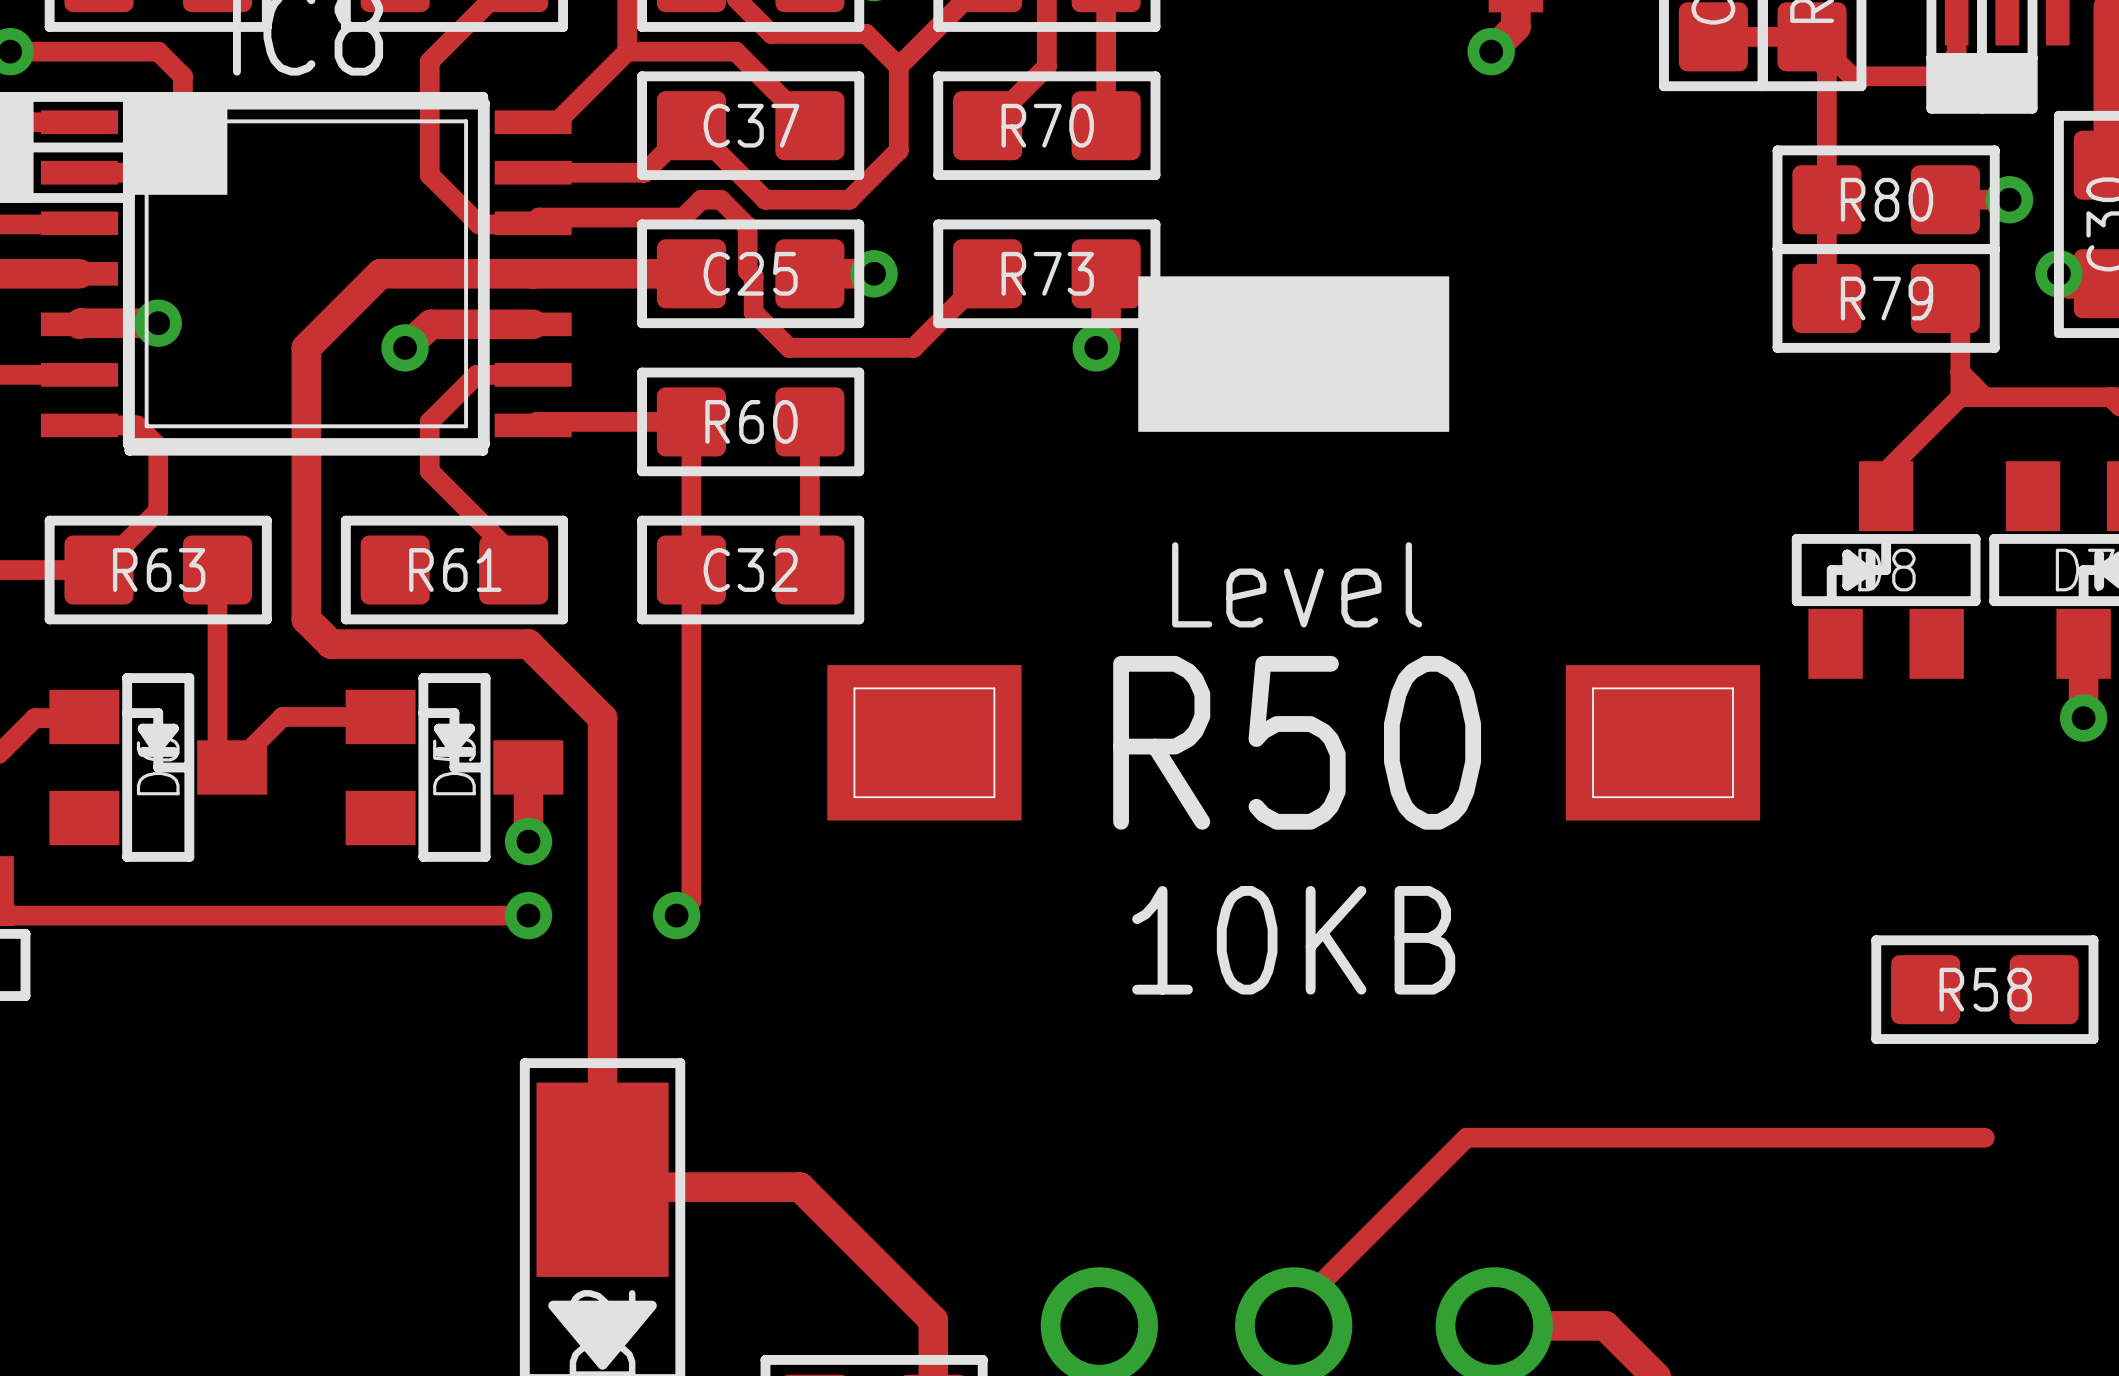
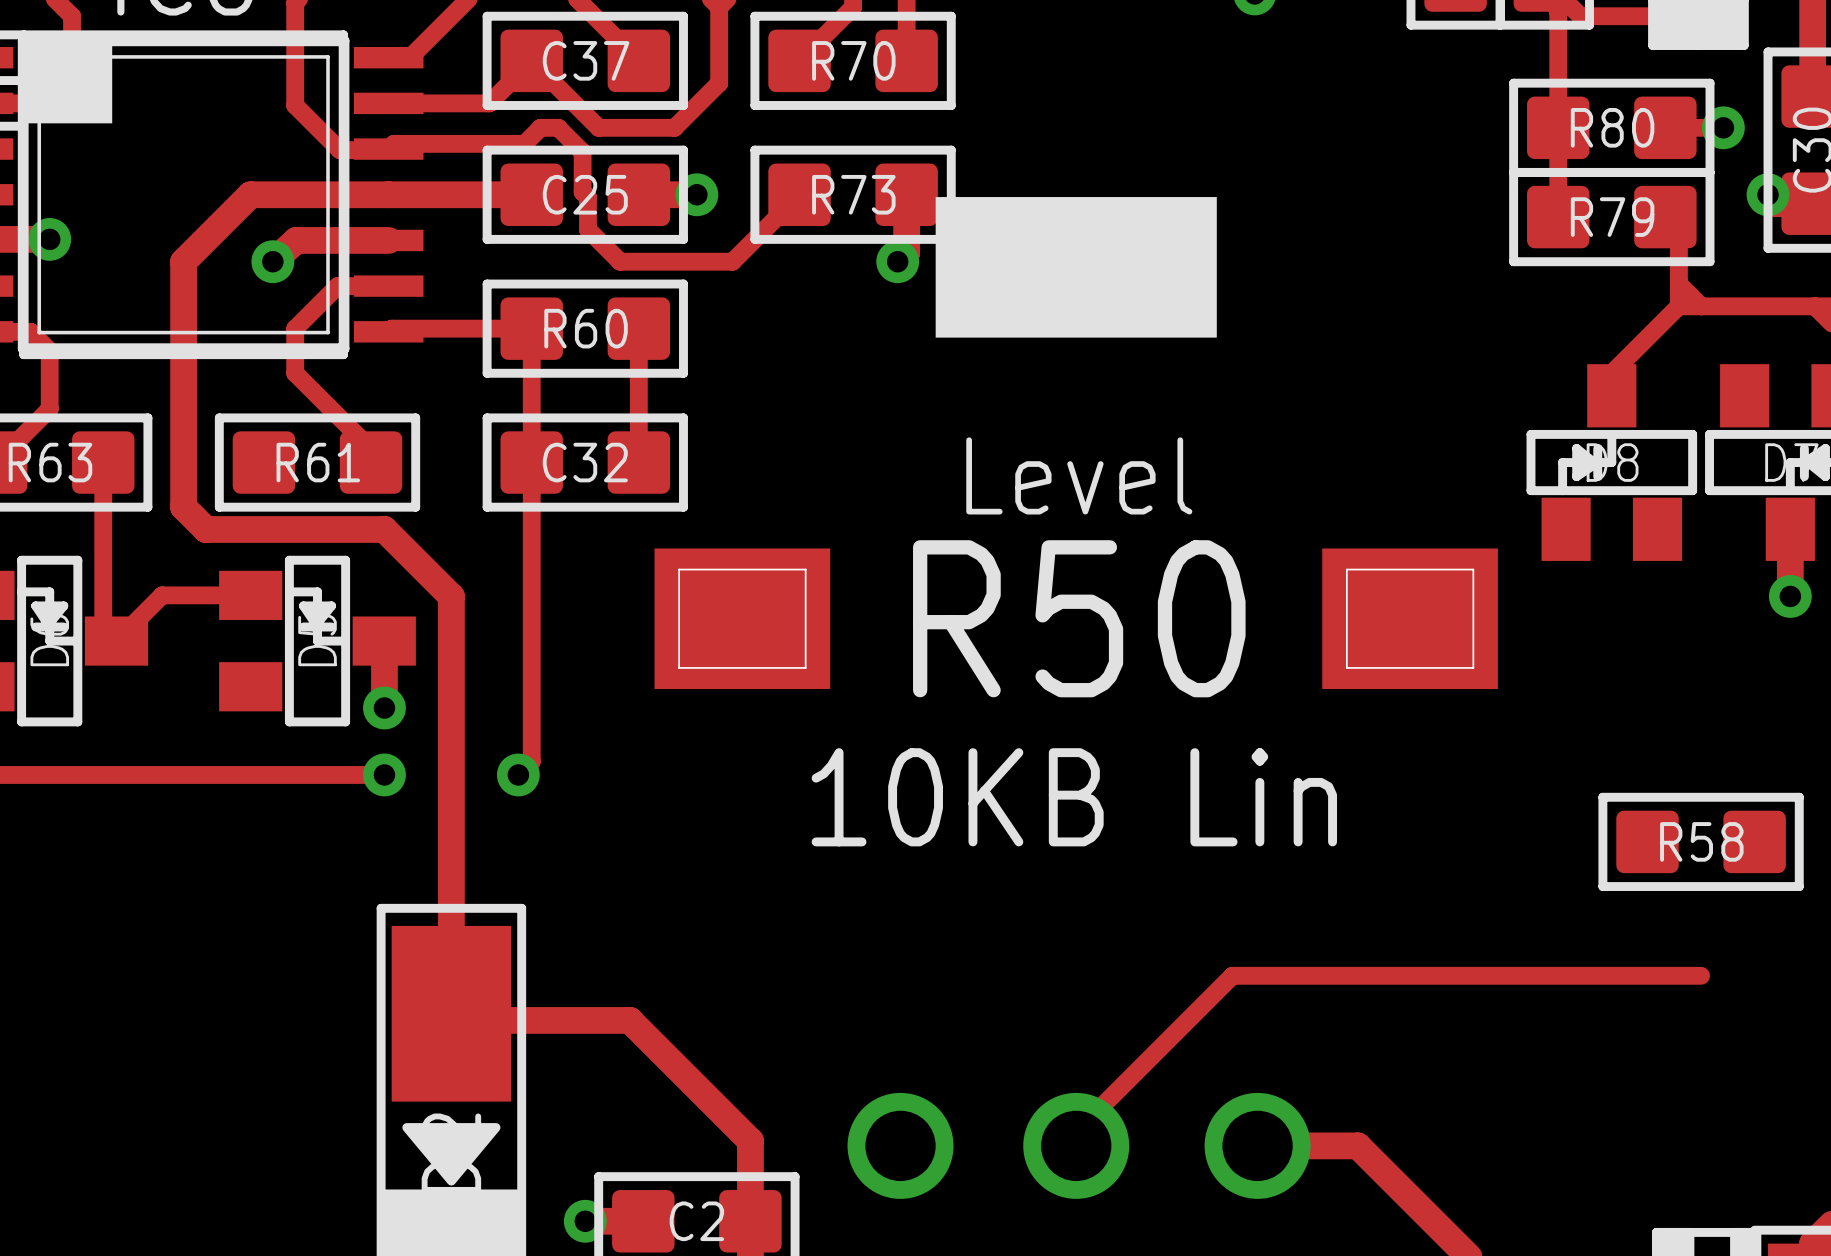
R50 value: 10KB (1293, 940) -> 10KB Lin (1074, 797)

